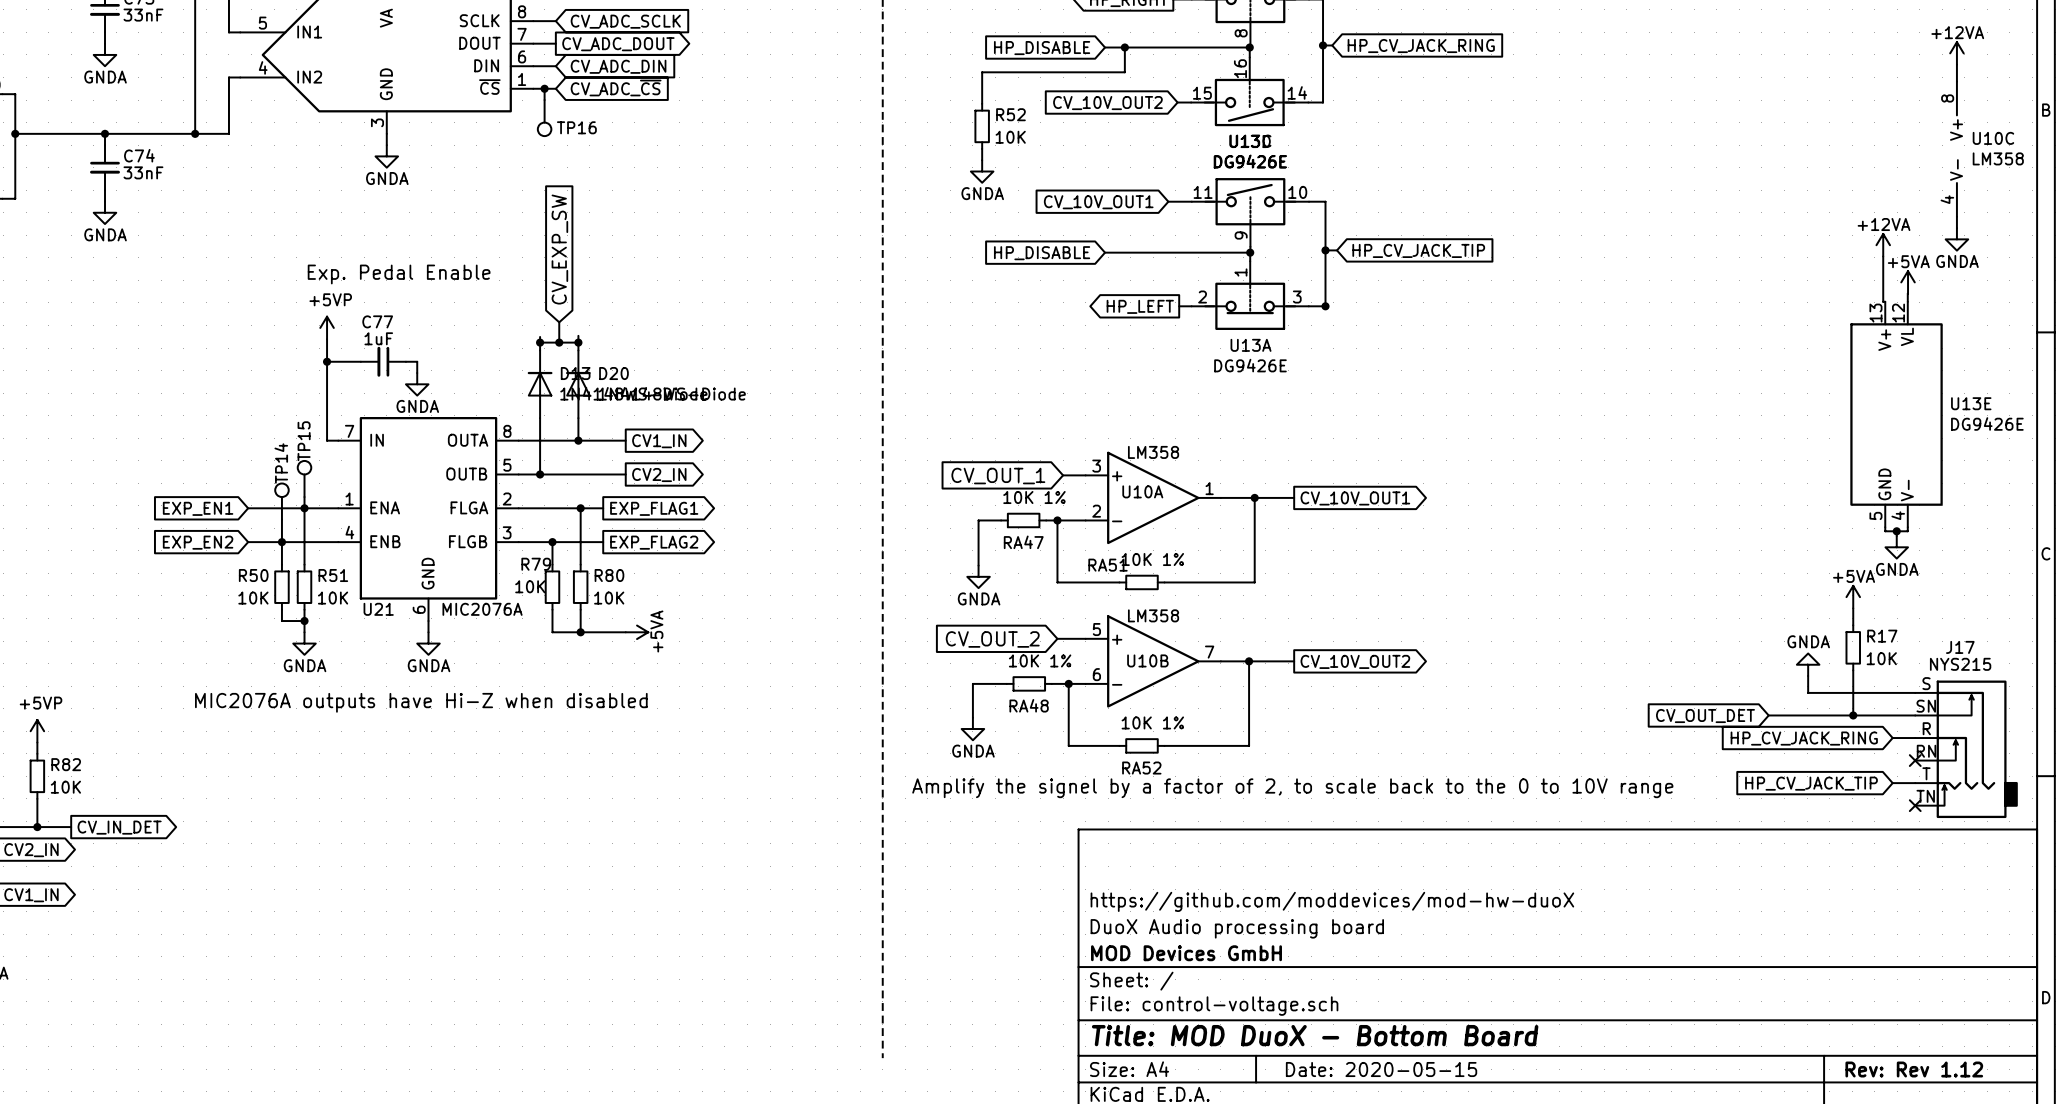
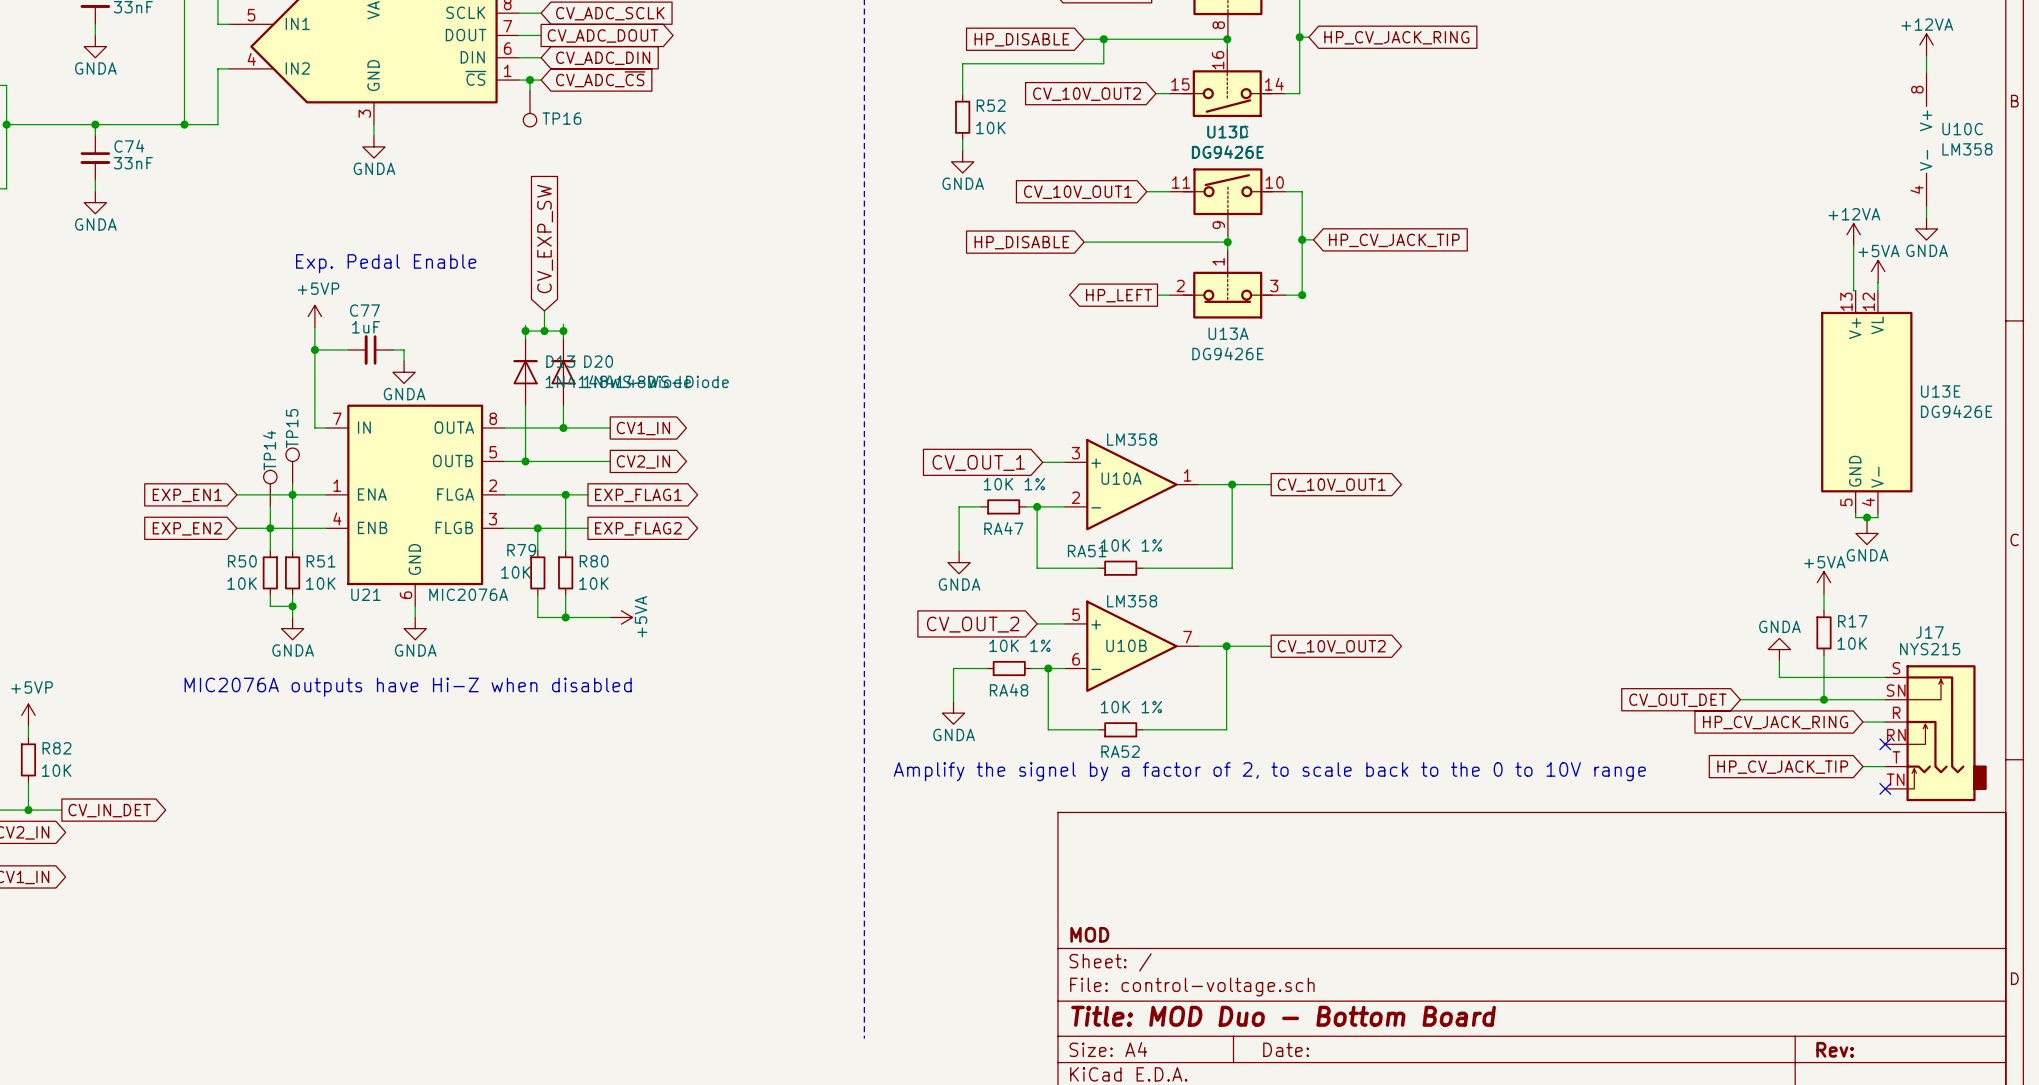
title block: https://github.com/moddevices/mod-hw-duoX (1332, 901) -> none
title block: DuoX Audio processing board (1237, 928) -> none
title block: MOD Devices GmbH (1186, 953) -> MOD (1089, 934)
title block: Title: MOD DuoX - Bottom Board (1315, 1035) -> Title: MOD Duo - Bottom Board (1283, 1016)
title block: Date: 2020-05-15 (1381, 1069) -> Date: (1286, 1049)
title block: Rev: Rev 1.12 (1914, 1069) -> Rev: (1835, 1049)

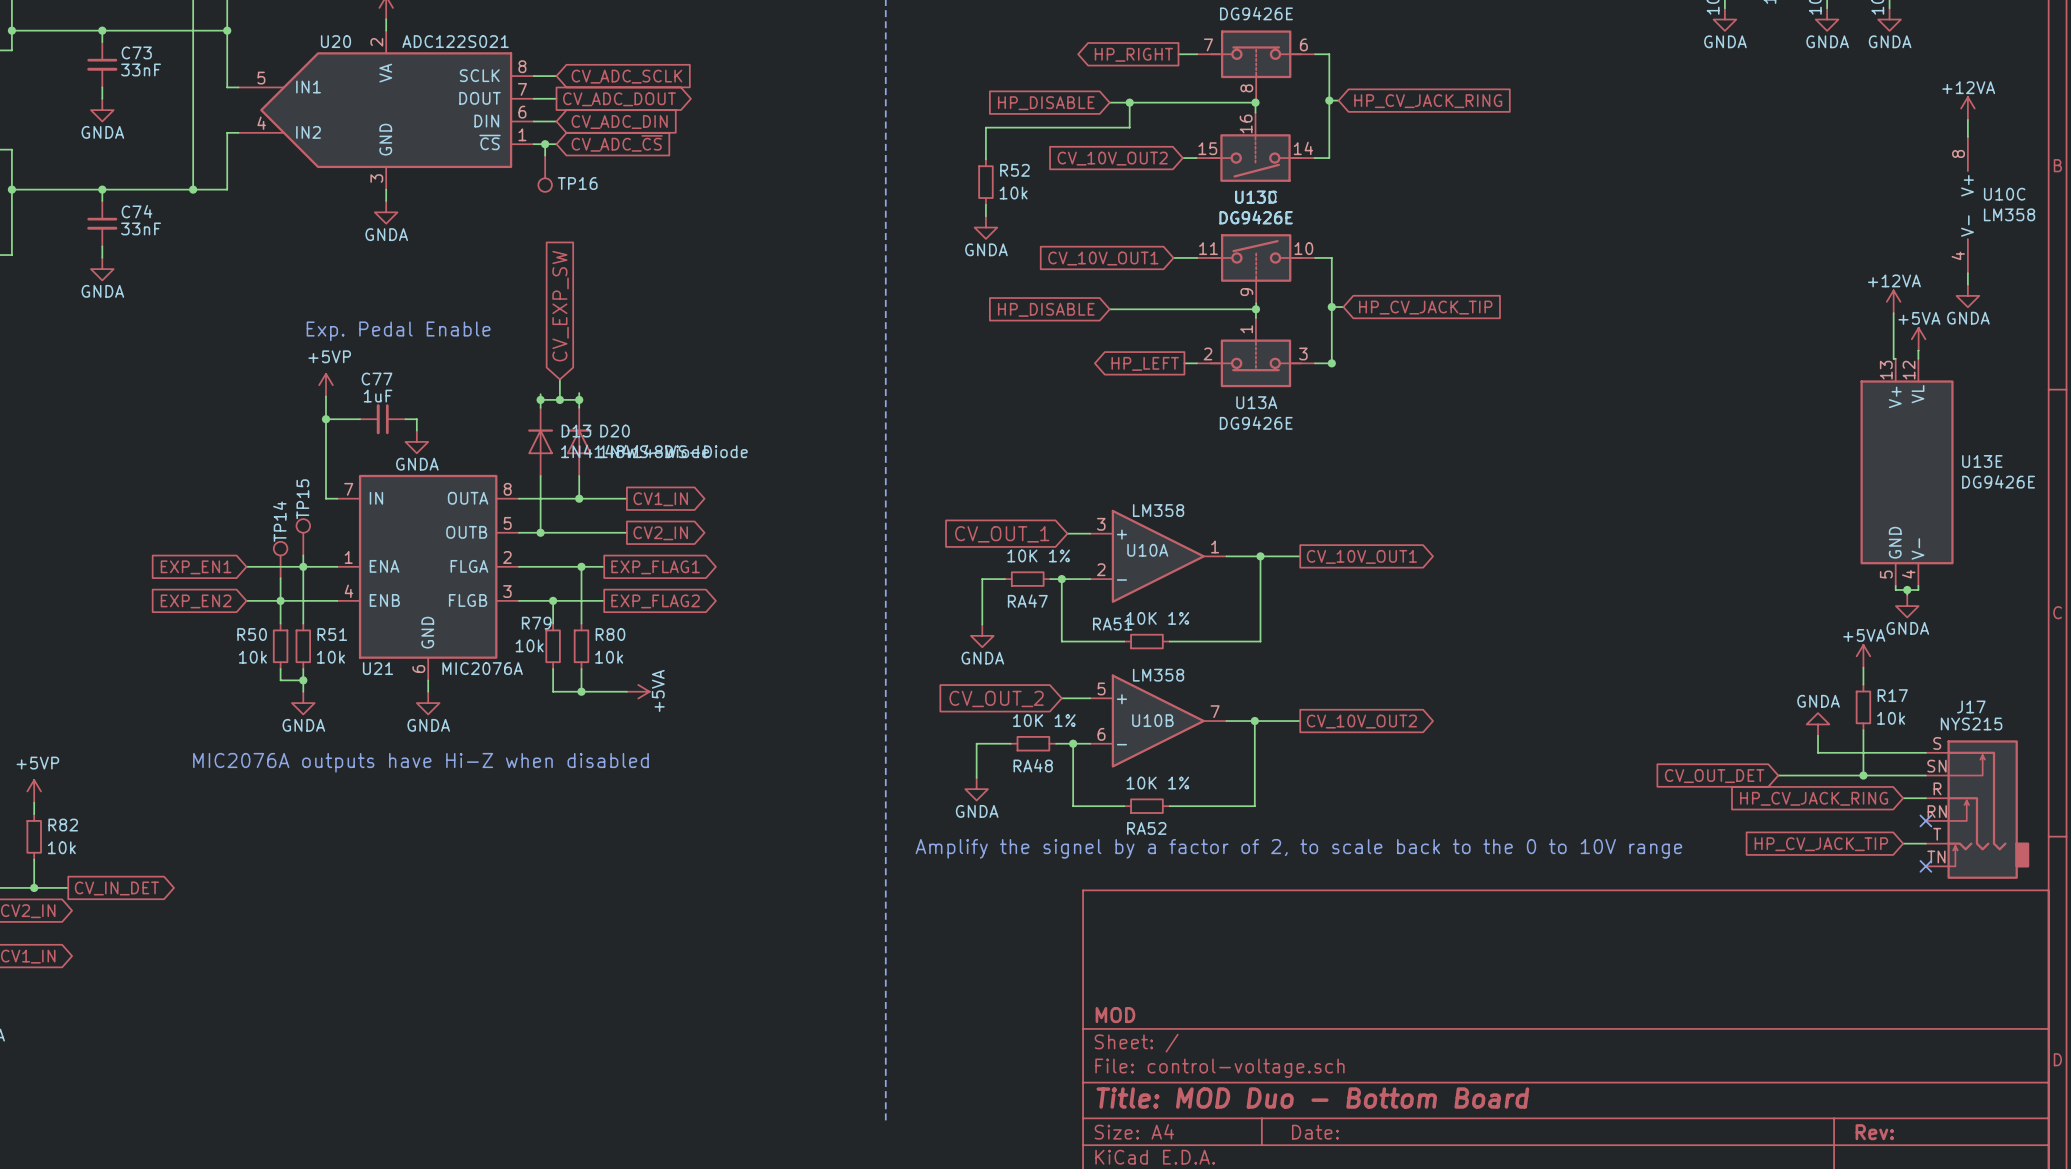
R52 value: 10K (990, 127) -> 10k (1013, 193)
R79 value: 10K (515, 572) -> 10k (529, 645)
R50 value: 10K (242, 583) -> 10k (252, 657)
R51 value: 10K (320, 583) -> 10k (330, 657)
R80 value: 10K (593, 583) -> 10k (609, 657)
R17 value: 10K (1852, 643) -> 10k (1891, 718)
R82 value: 10K (56, 770) -> 10k (61, 847)

